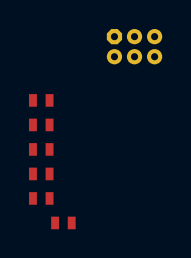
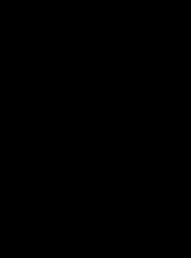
part: (134, 46) -> none
part: (41, 100) -> none
part: (41, 124) -> none
part: (41, 149) -> none
part: (41, 173) -> none
part: (41, 198) -> none
part: (63, 222) -> none

